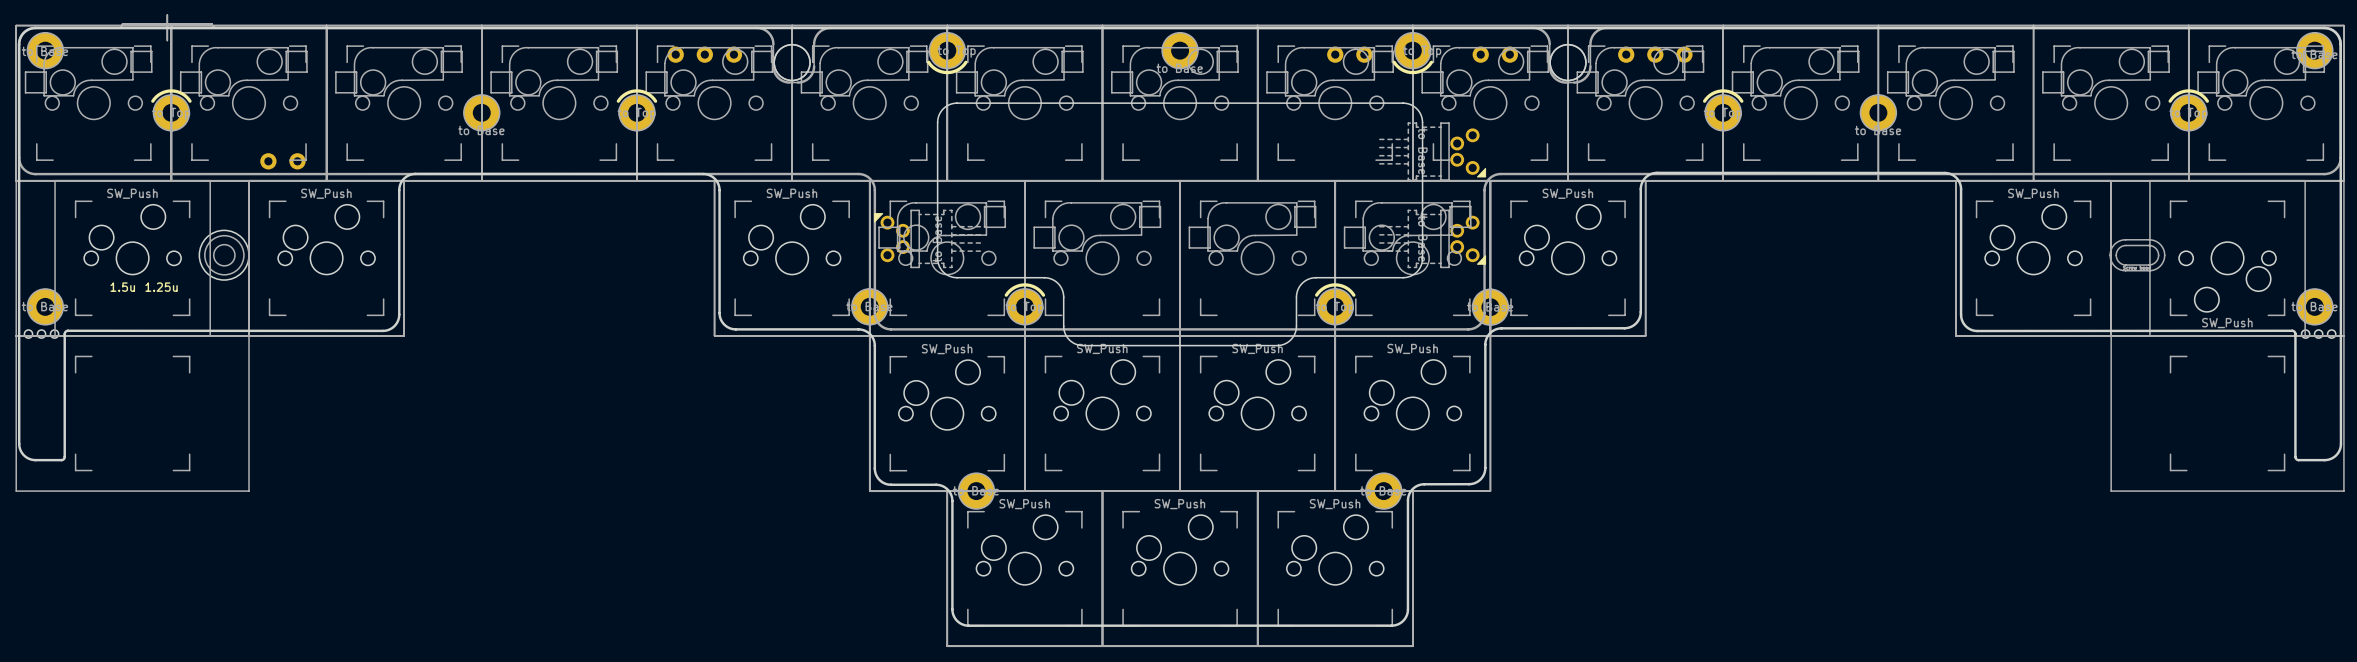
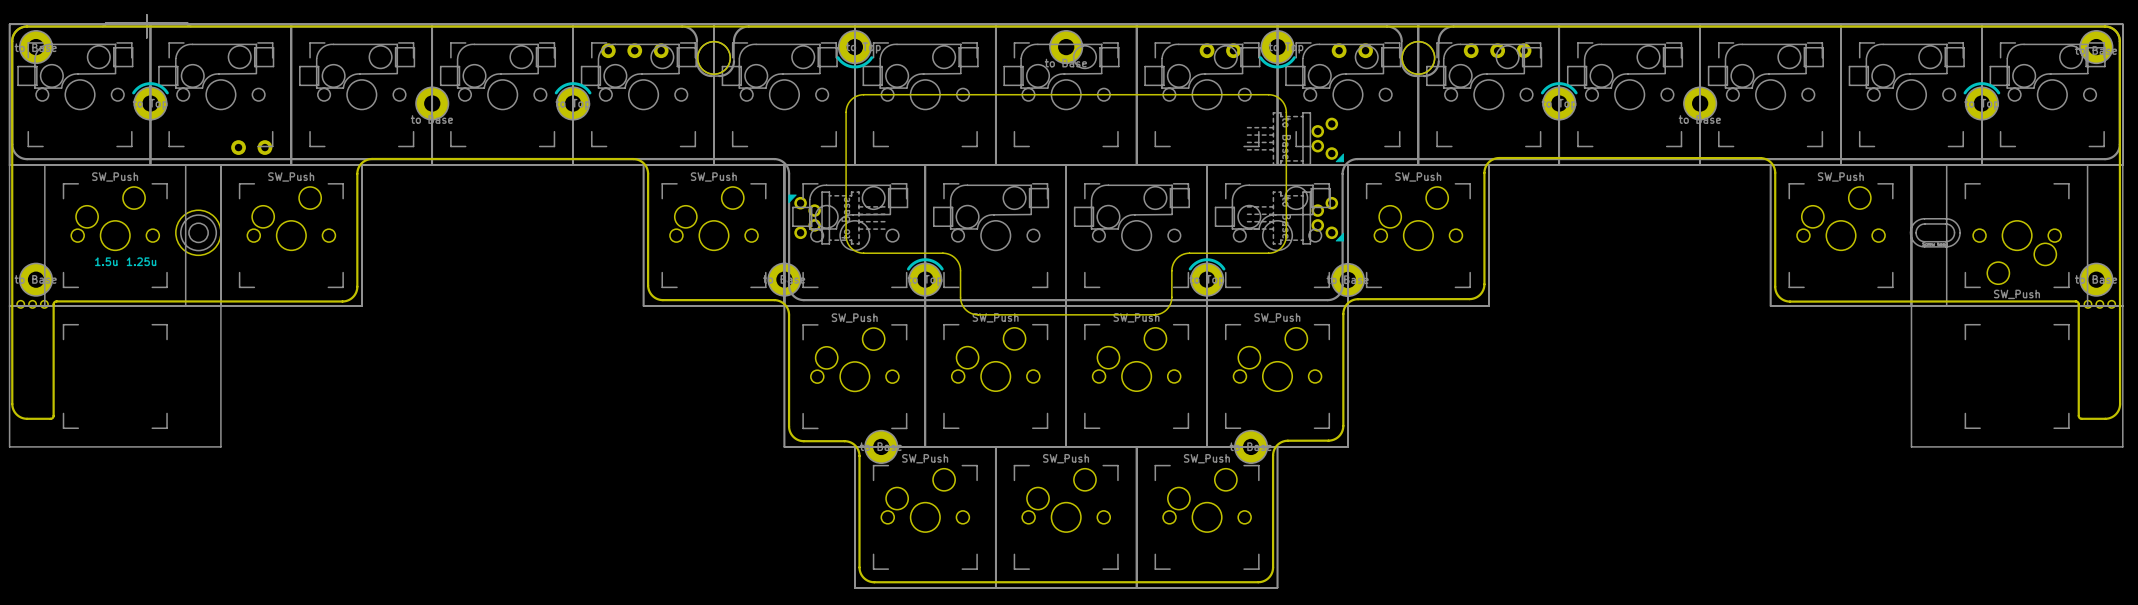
part footprint: [15, 14, 2345, 647] -> [9, 14, 2124, 589]

